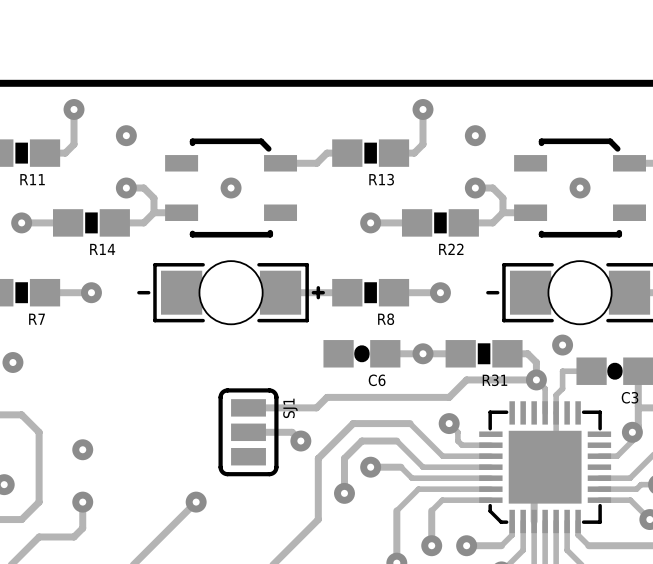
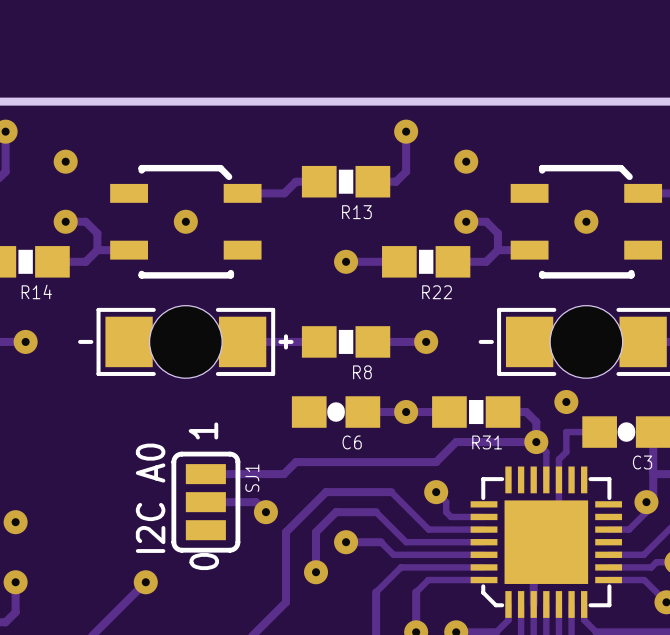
text: none -> 1 (203, 430)
text: none -> I2C A0 (150, 498)
text: none -> 0 (204, 561)

